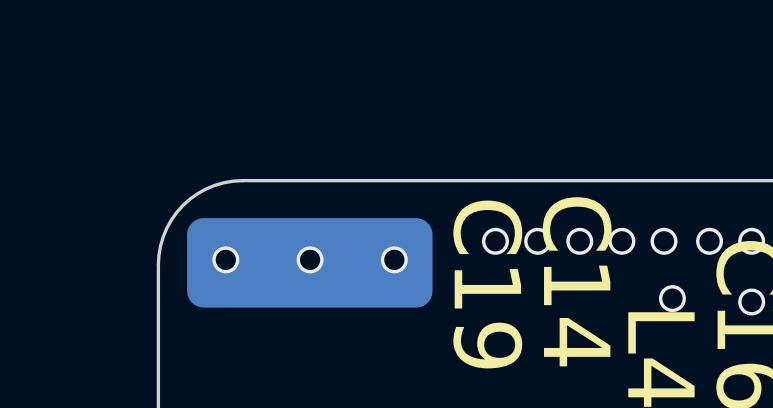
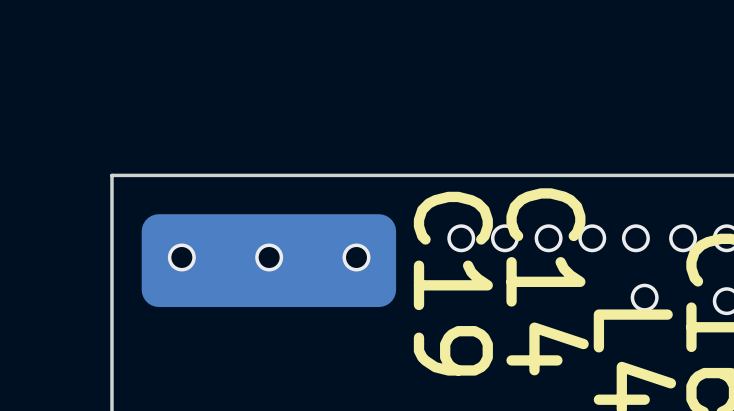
board edge: (242, 180) (223, 182) (206, 188) (183, 205) (171, 220) (163, 237) (158, 264) -> (199, 175) (111, 175) (111, 262)

